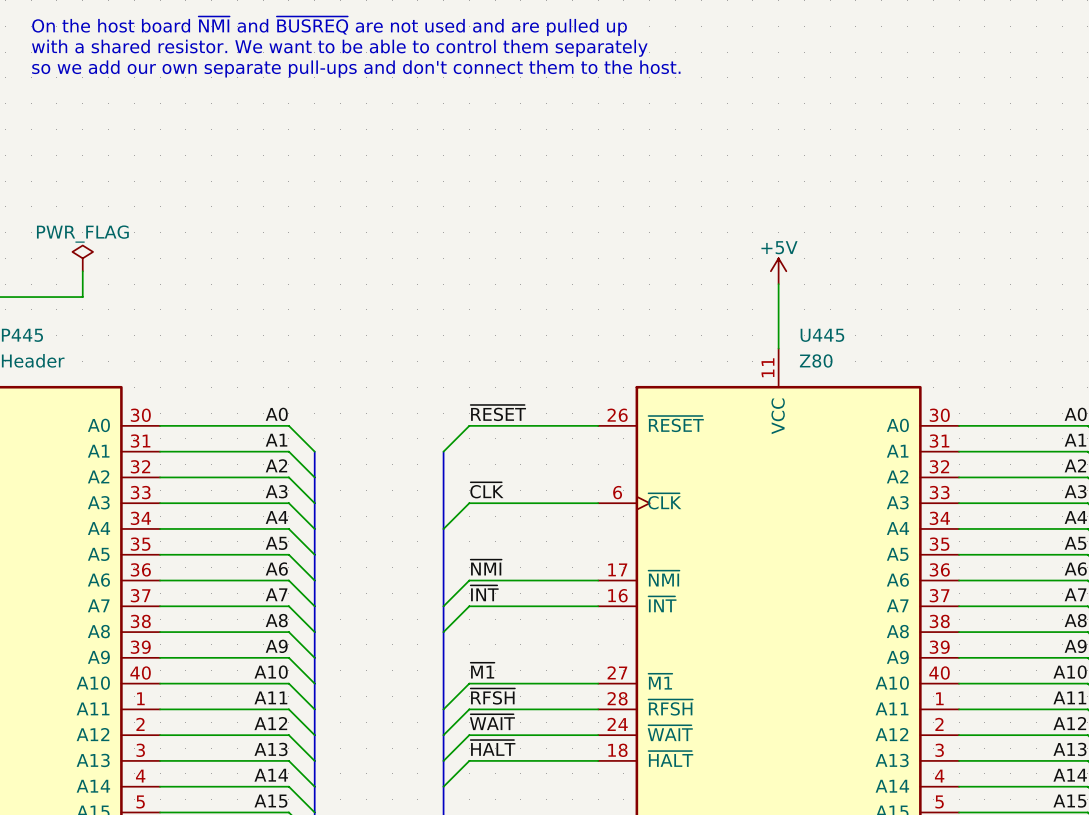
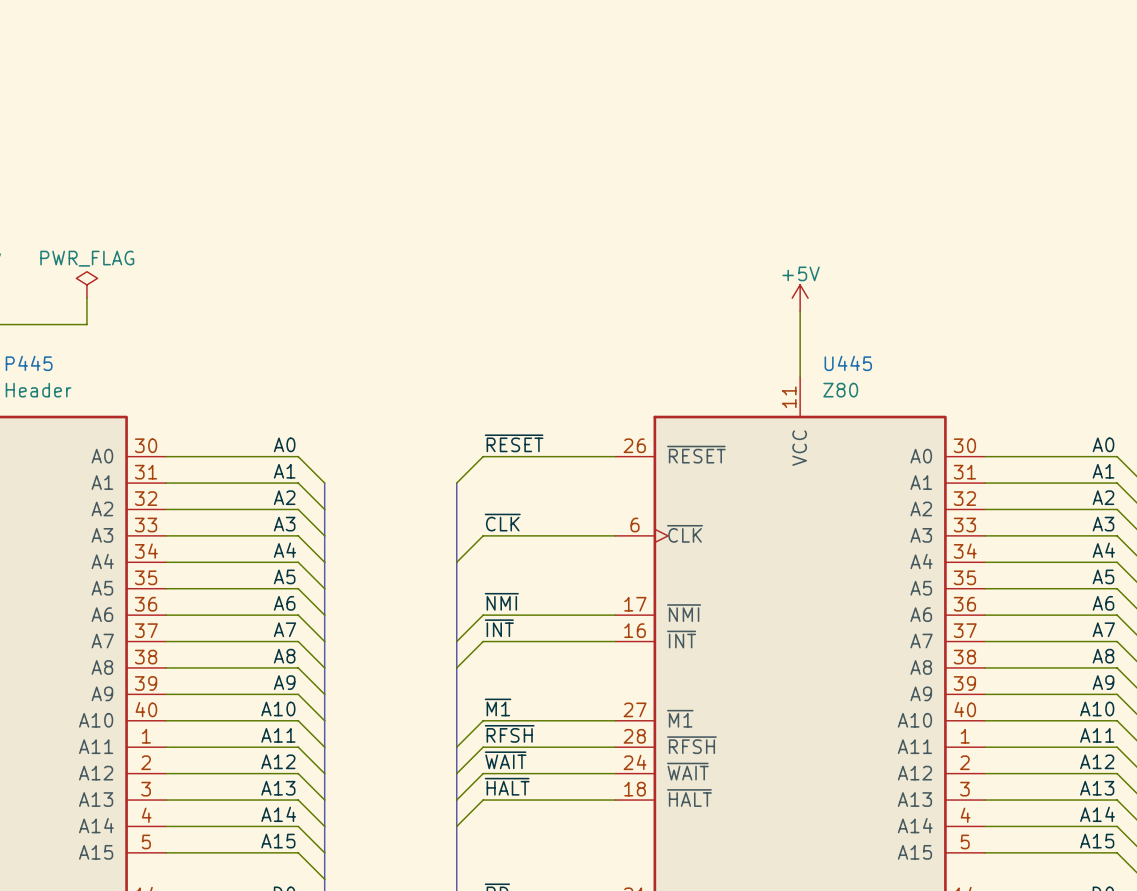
text: On the host board ~{NMI} and ~{BUSREQ} are not used and are pulled up (329, 26) -> none
text: with a shared resistor. We want to be able to control them separately (339, 48) -> none
text: so we add our own separate pull-ups and don't connect them to the host. (356, 68) -> none

